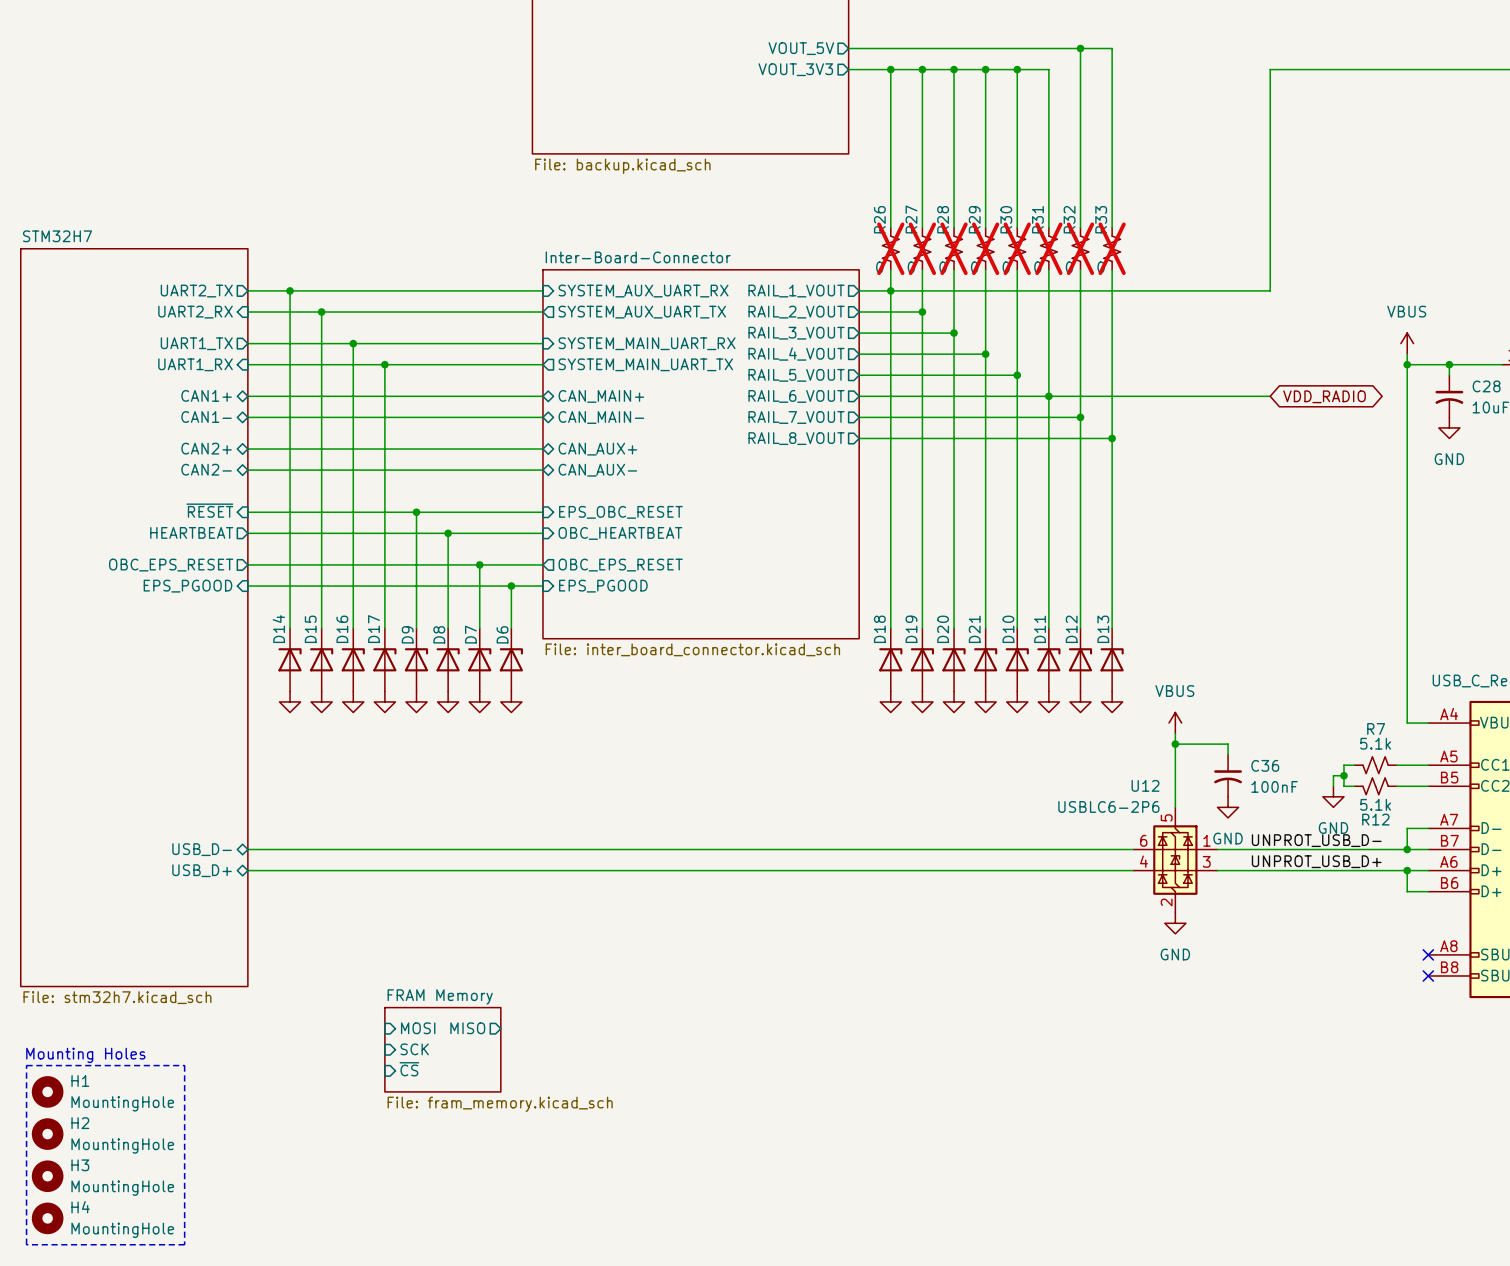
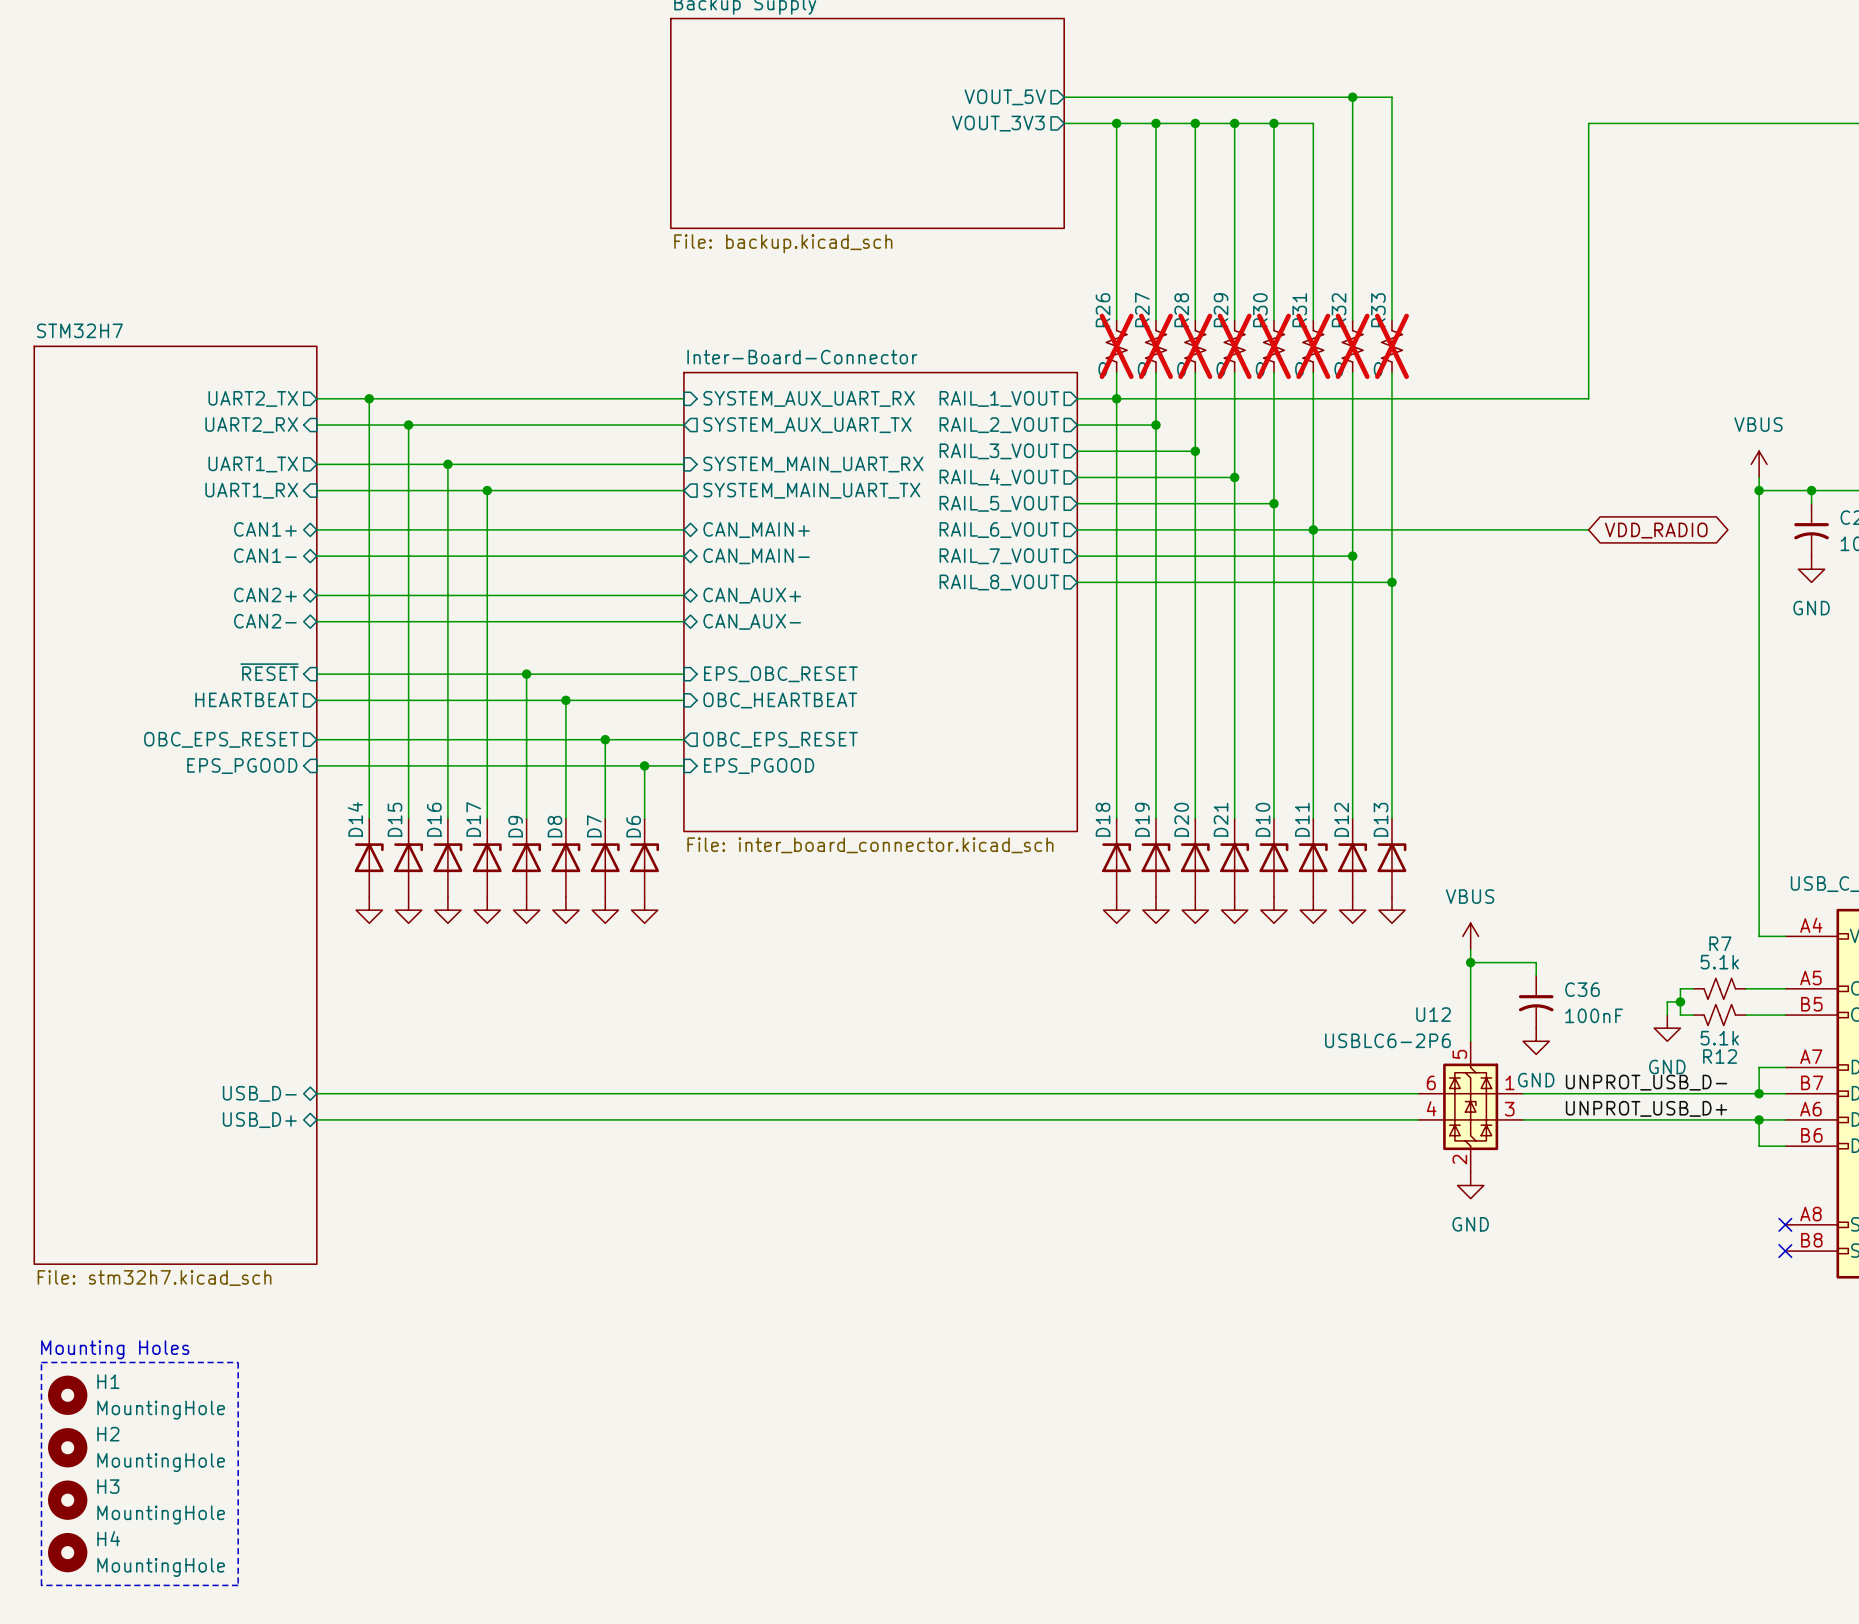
sheet pin: MOSI (418, 1028) -> none
sheet pin: MISO (467, 1028) -> none
sheet pin: SCK (414, 1049) -> none
sheet FRAM Memory: File: fram_memory.kicad_sch (442, 1049) -> none
sheet pin: ~{CS} (409, 1069) -> none

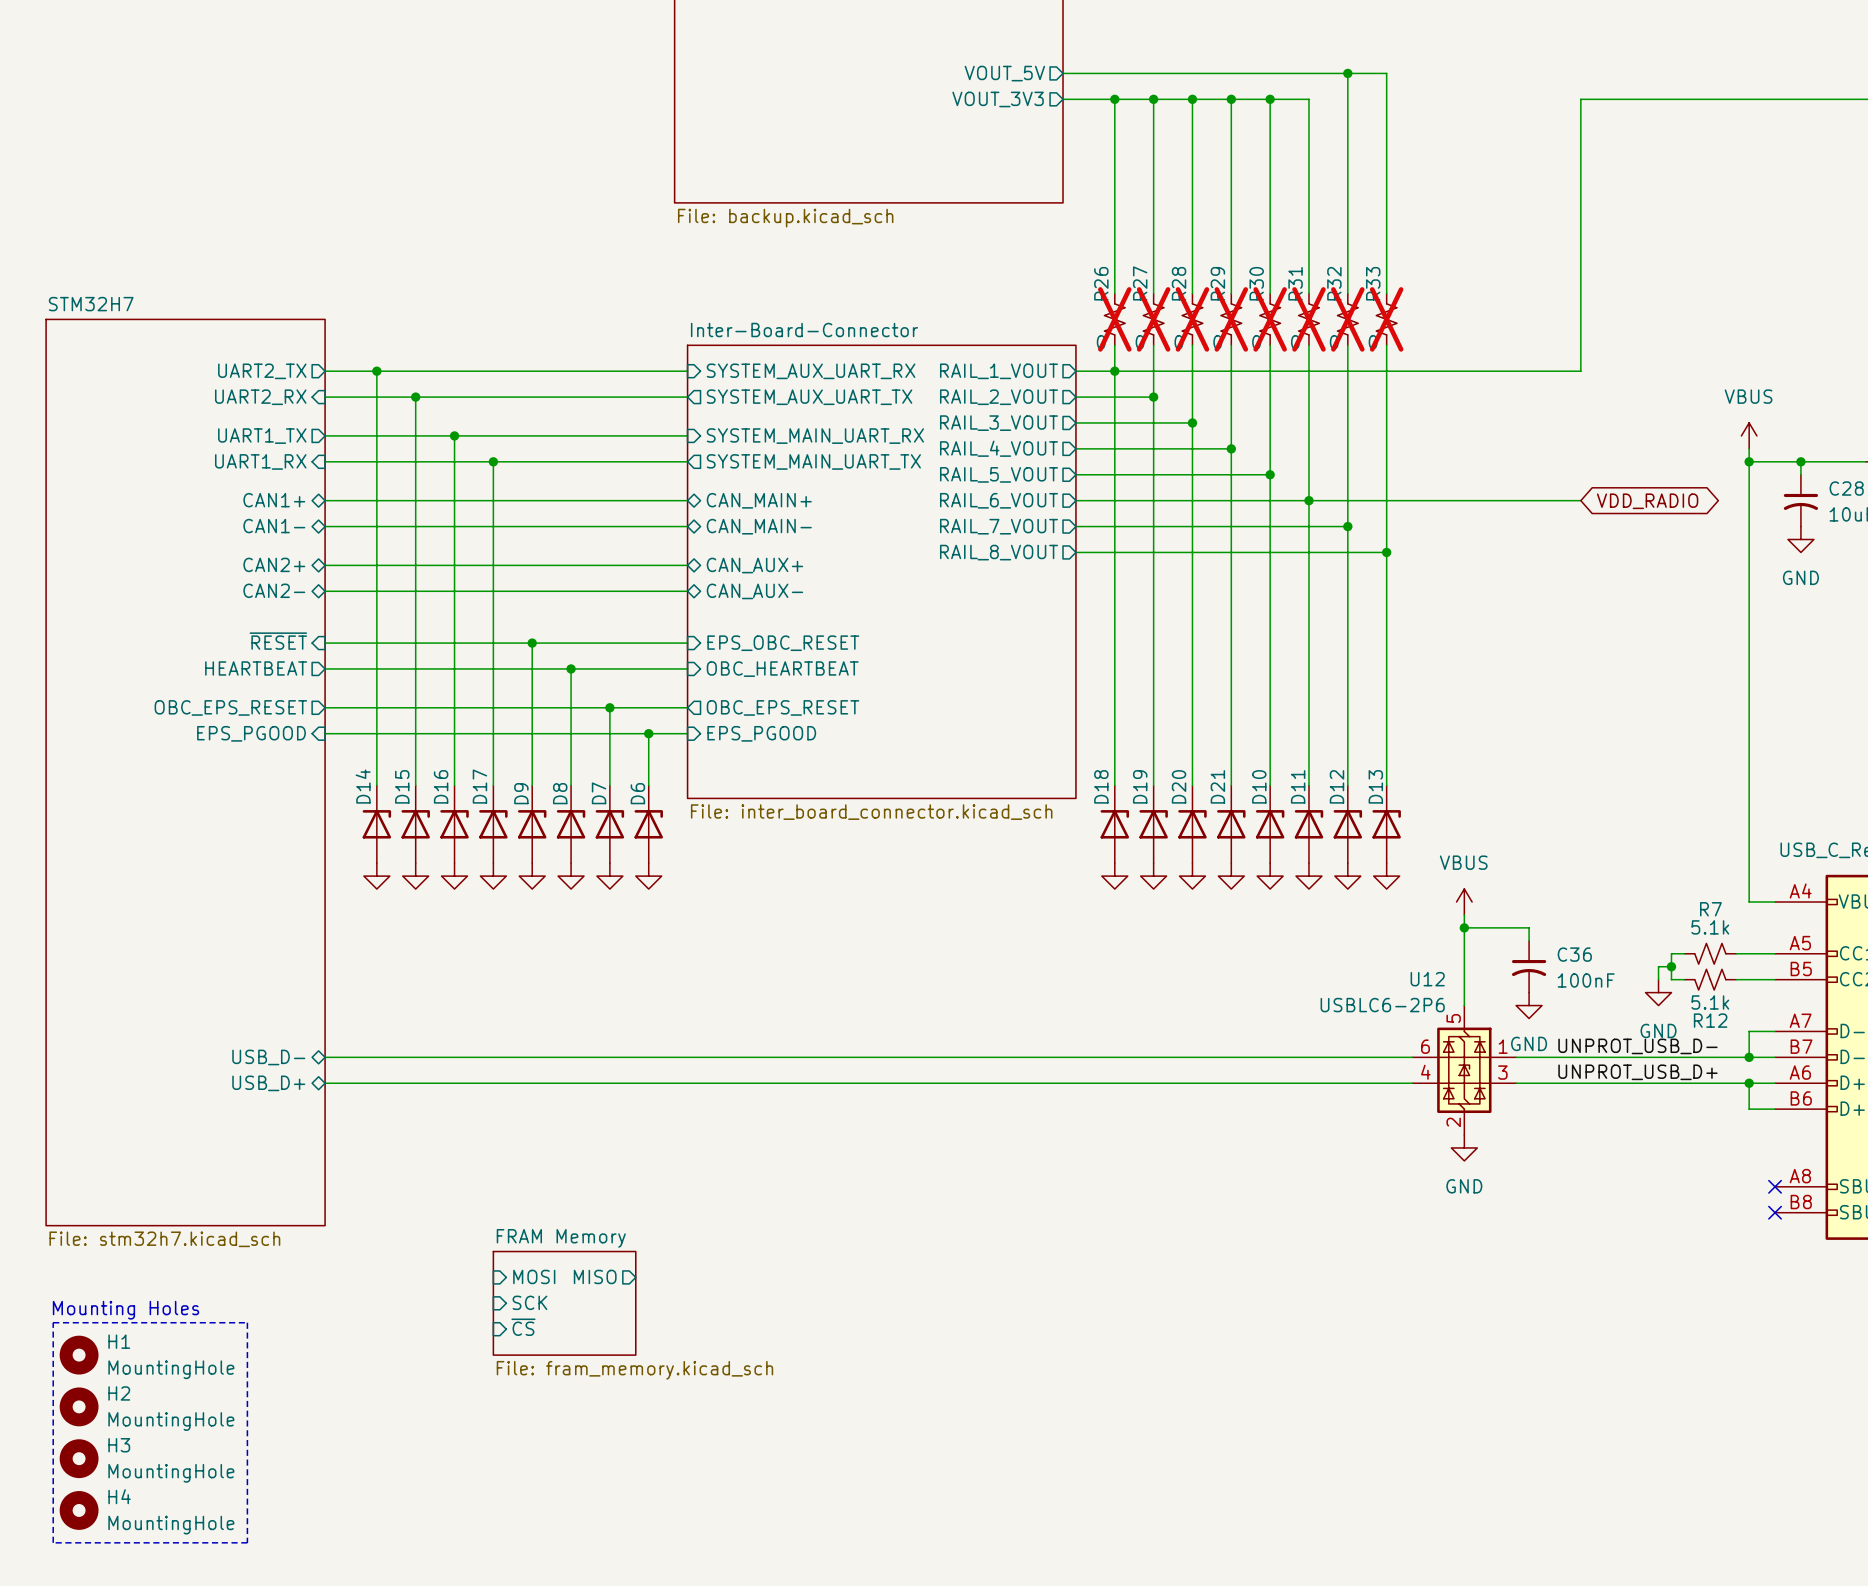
sheet pin: none -> MOSI (534, 1276)
sheet pin: none -> MISO (595, 1276)
sheet pin: none -> SCK (529, 1302)
sheet FRAM Memory: none -> File: fram_memory.kicad_sch (564, 1303)
sheet pin: none -> ~{CS} (523, 1327)

